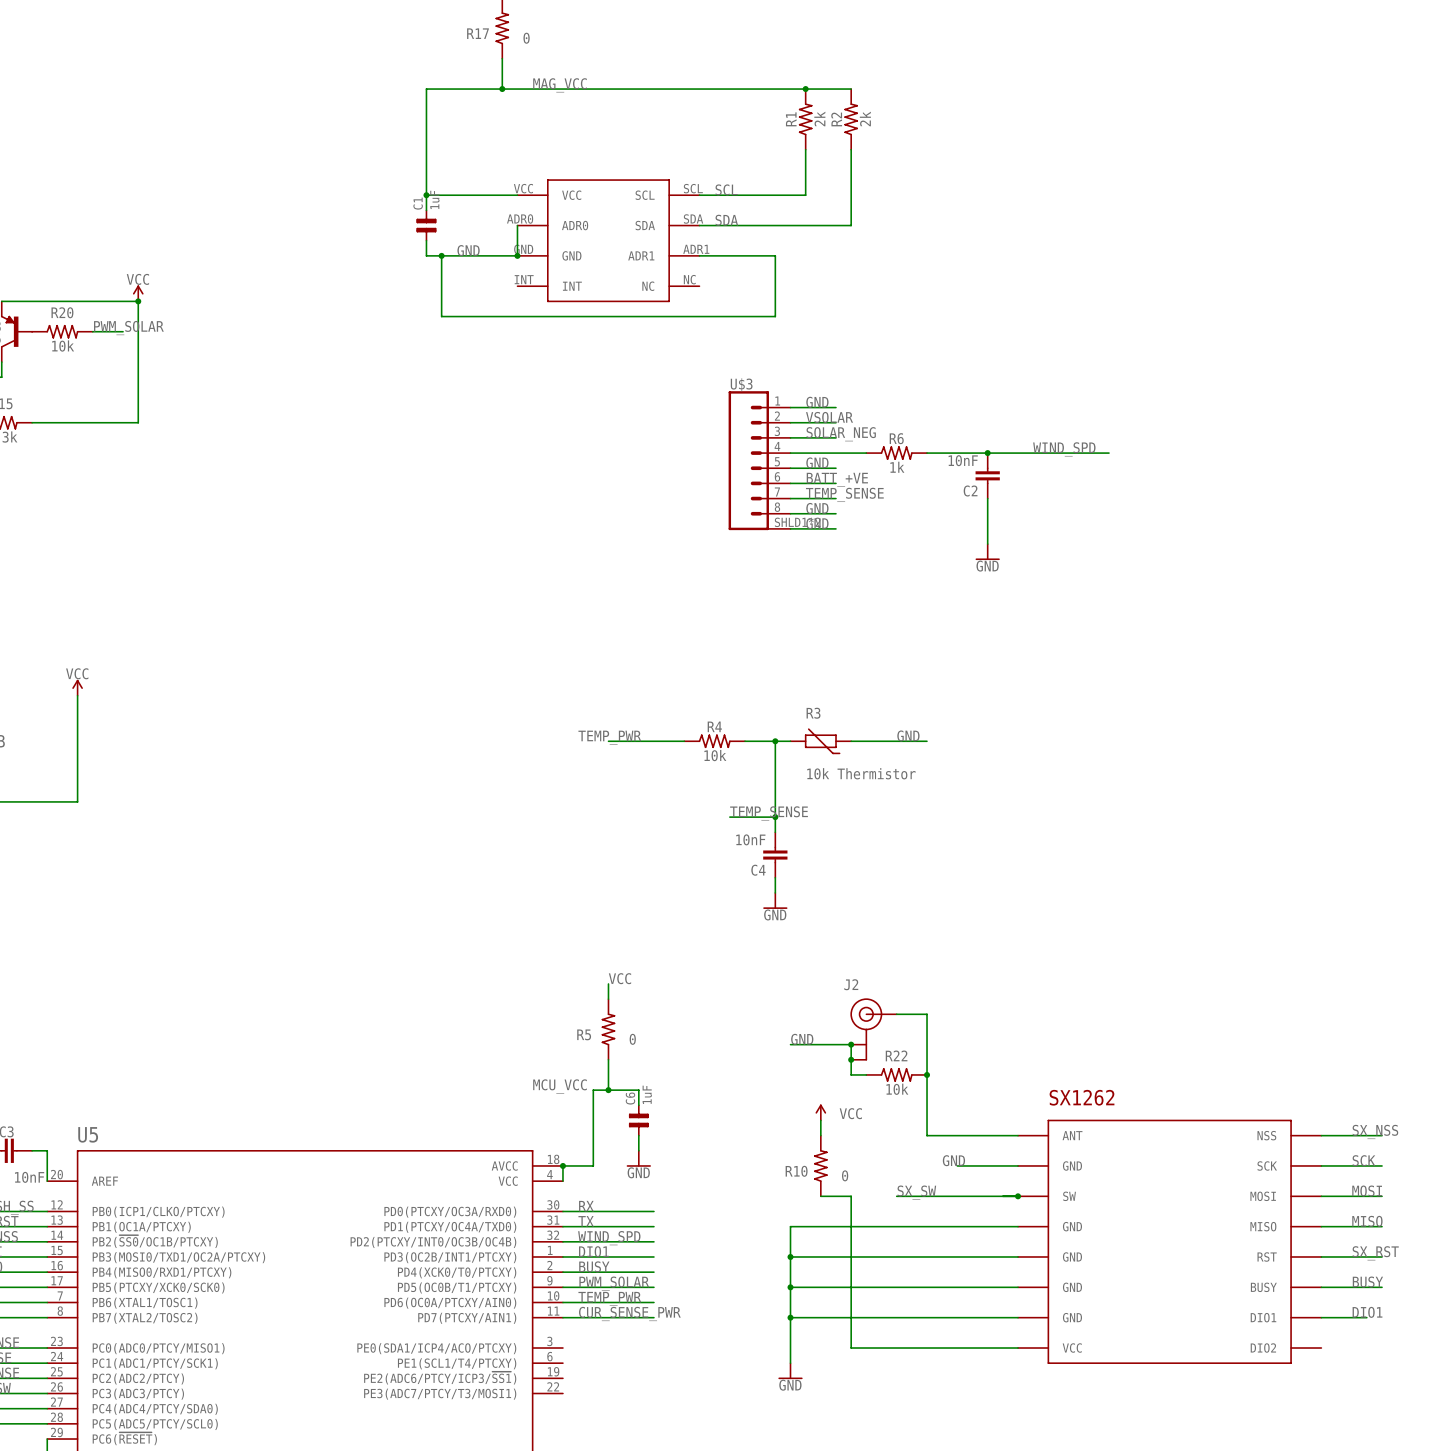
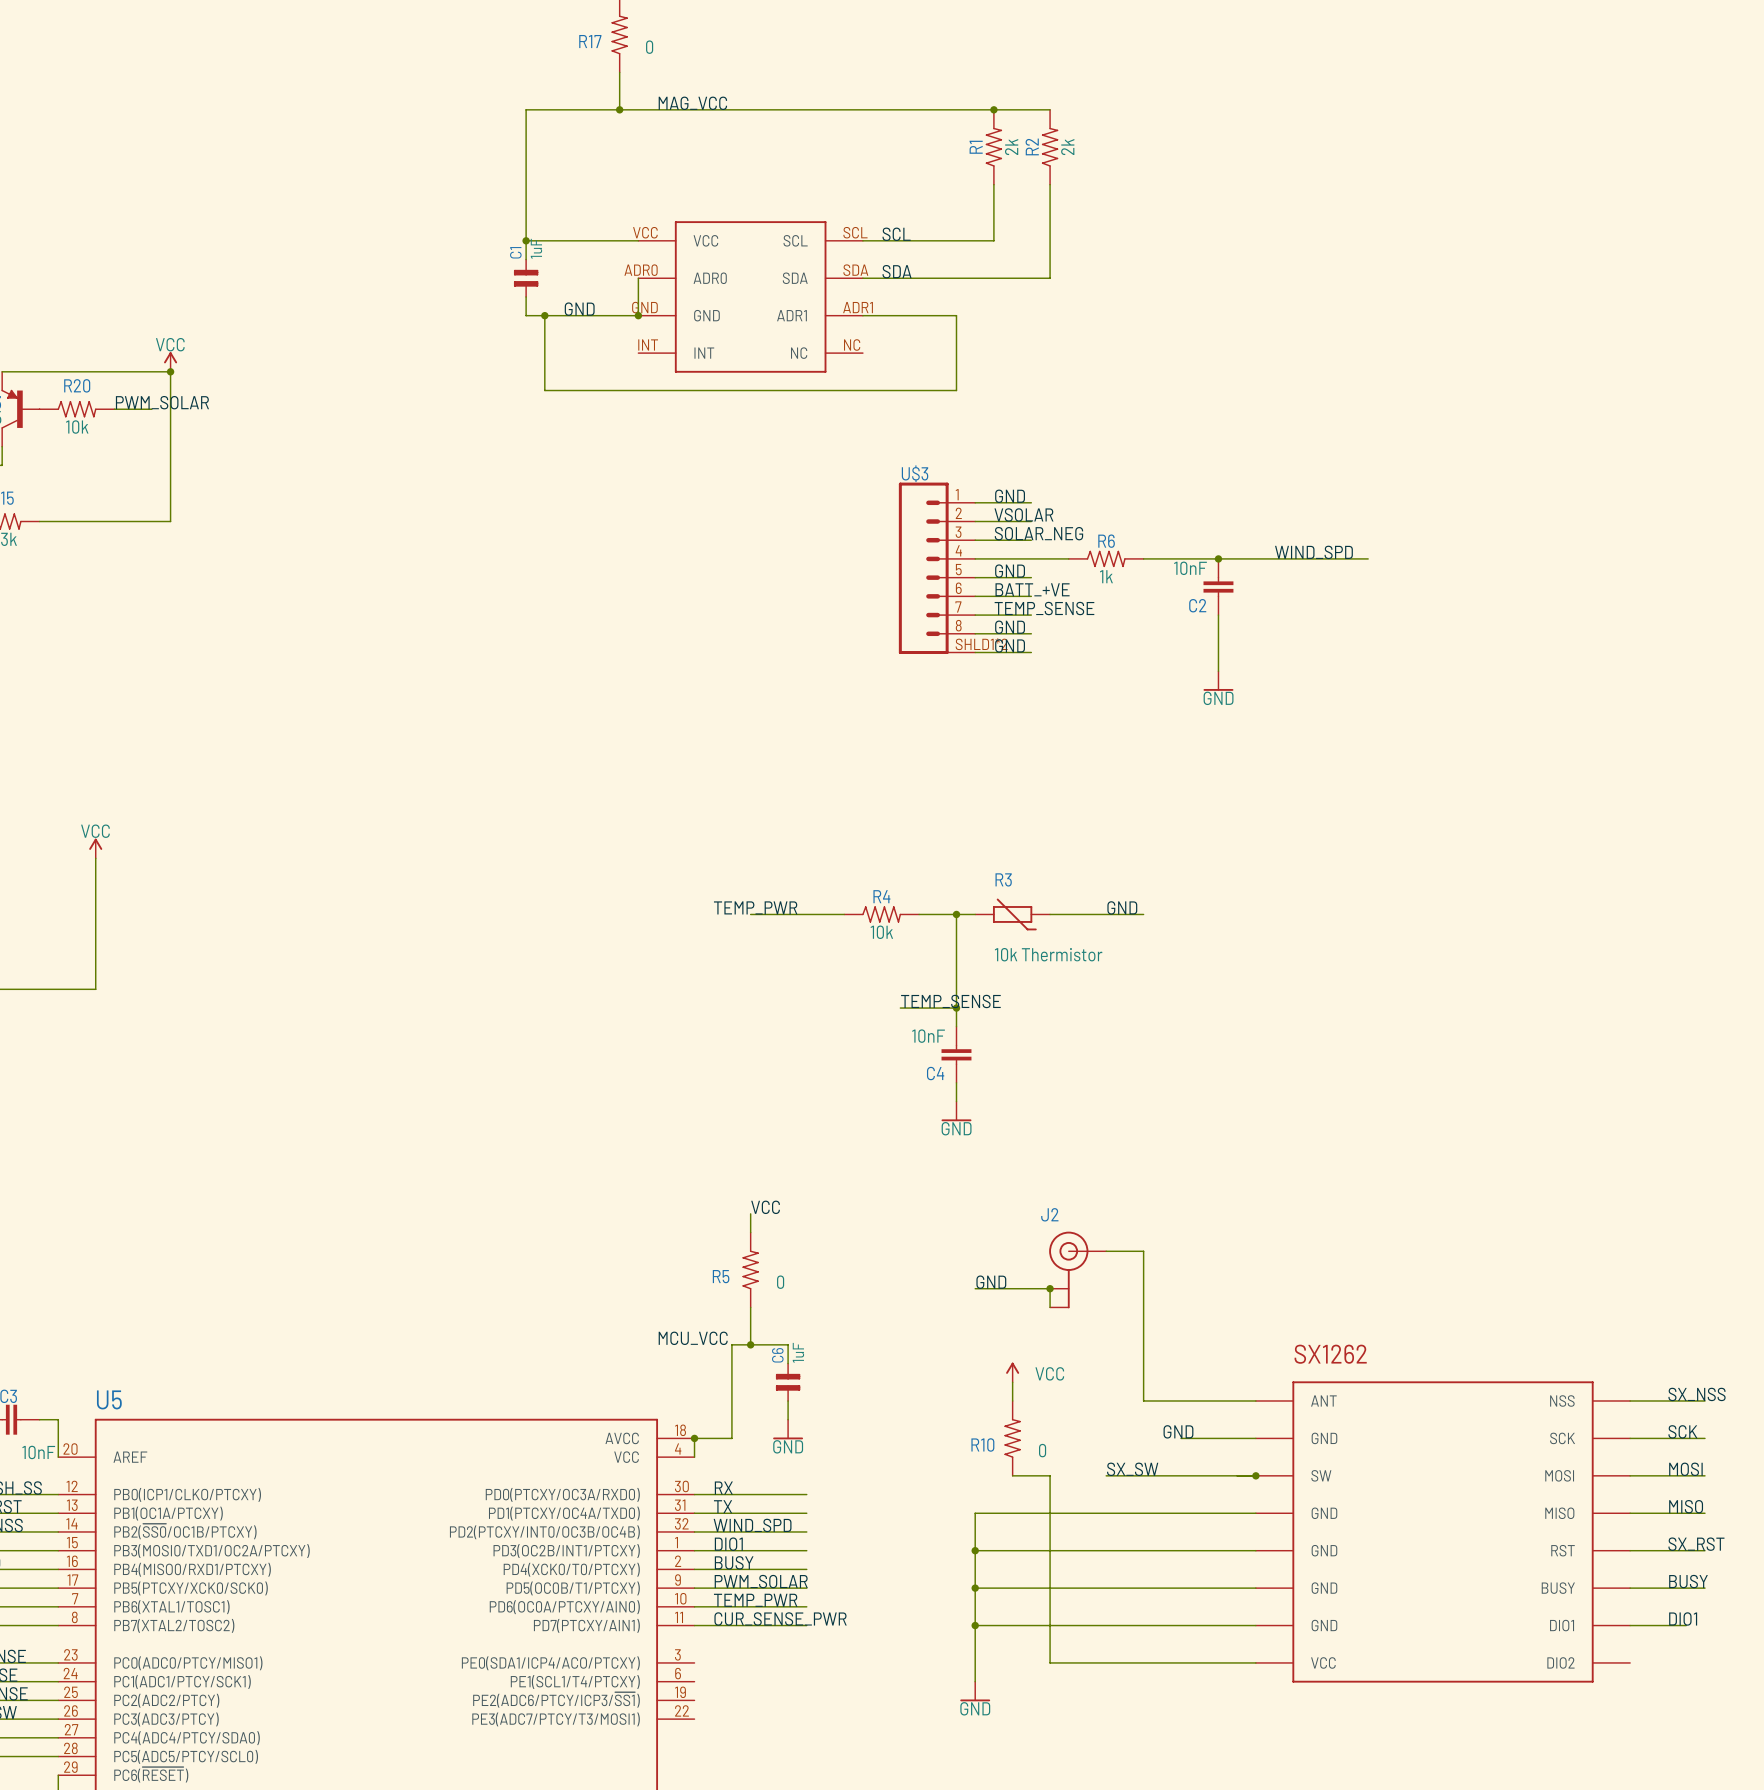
wire: (851, 1059) (851, 1074) (866, 1074) -> none
junction: (851, 1059) -> none
R22: 10k (896, 1074) -> none
junction: (927, 1074) -> none

